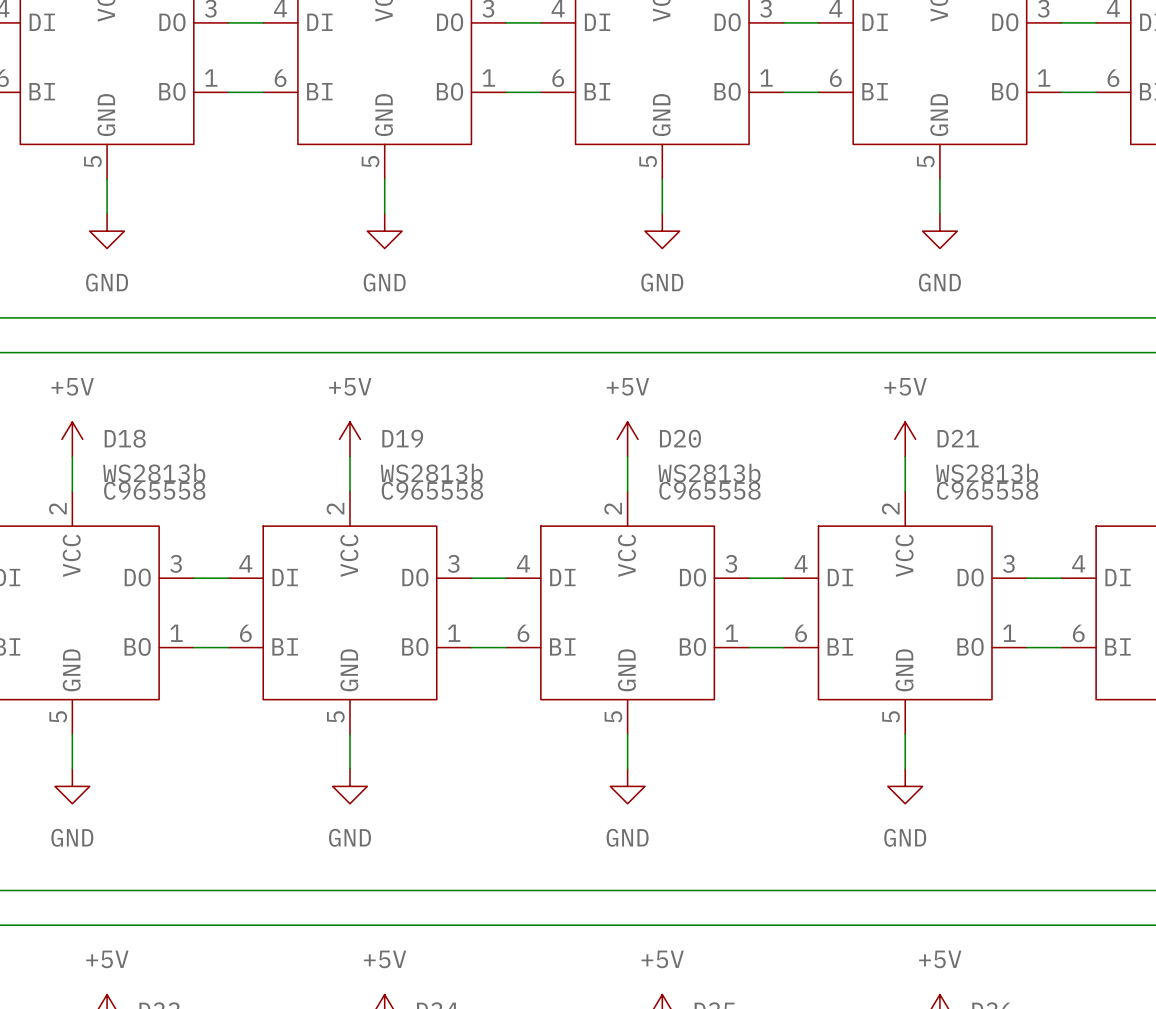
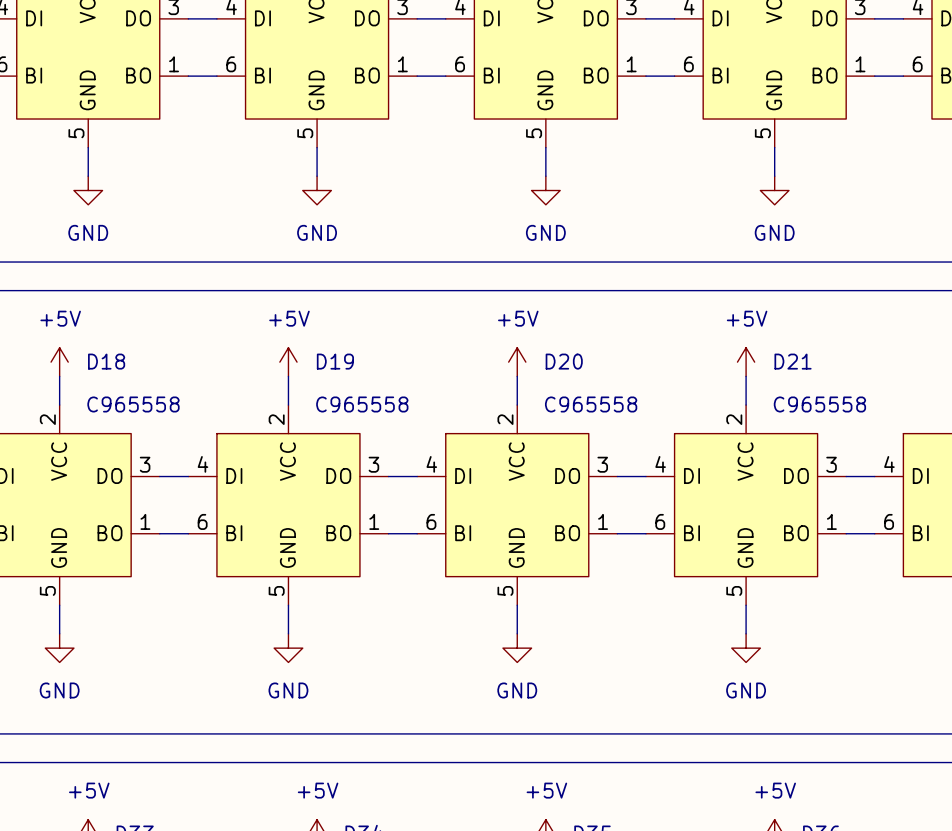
D18 value: WS2813b (154, 473) -> none
D19 value: WS2813b (431, 473) -> none
D20 value: WS2813b (709, 473) -> none
D21 value: WS2813b (987, 473) -> none

